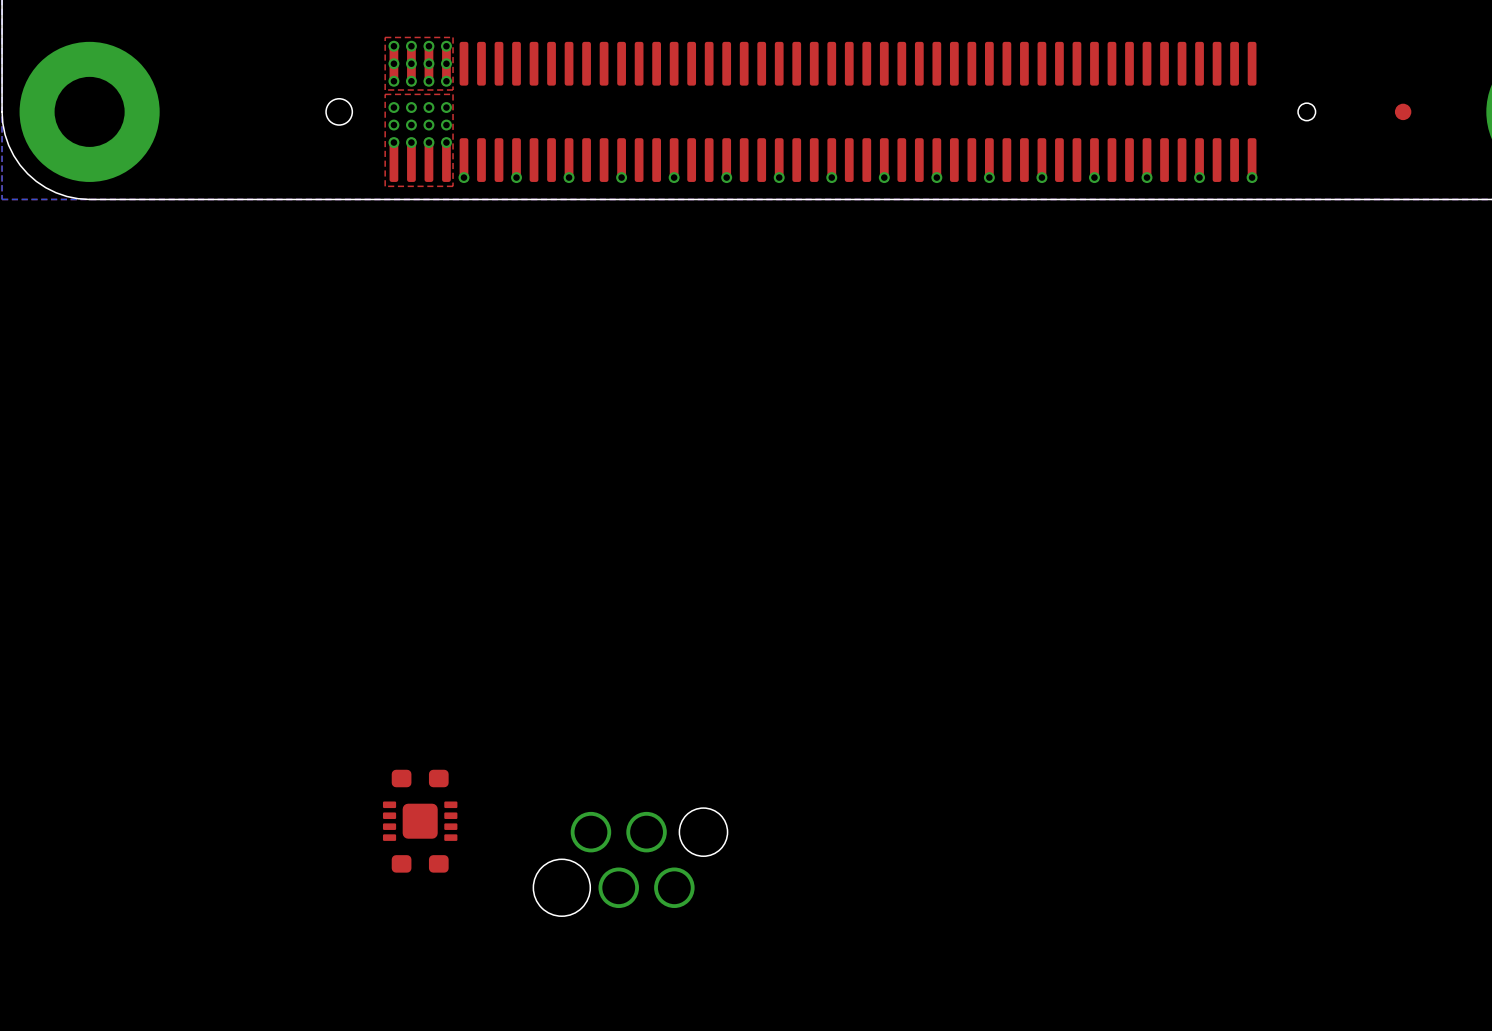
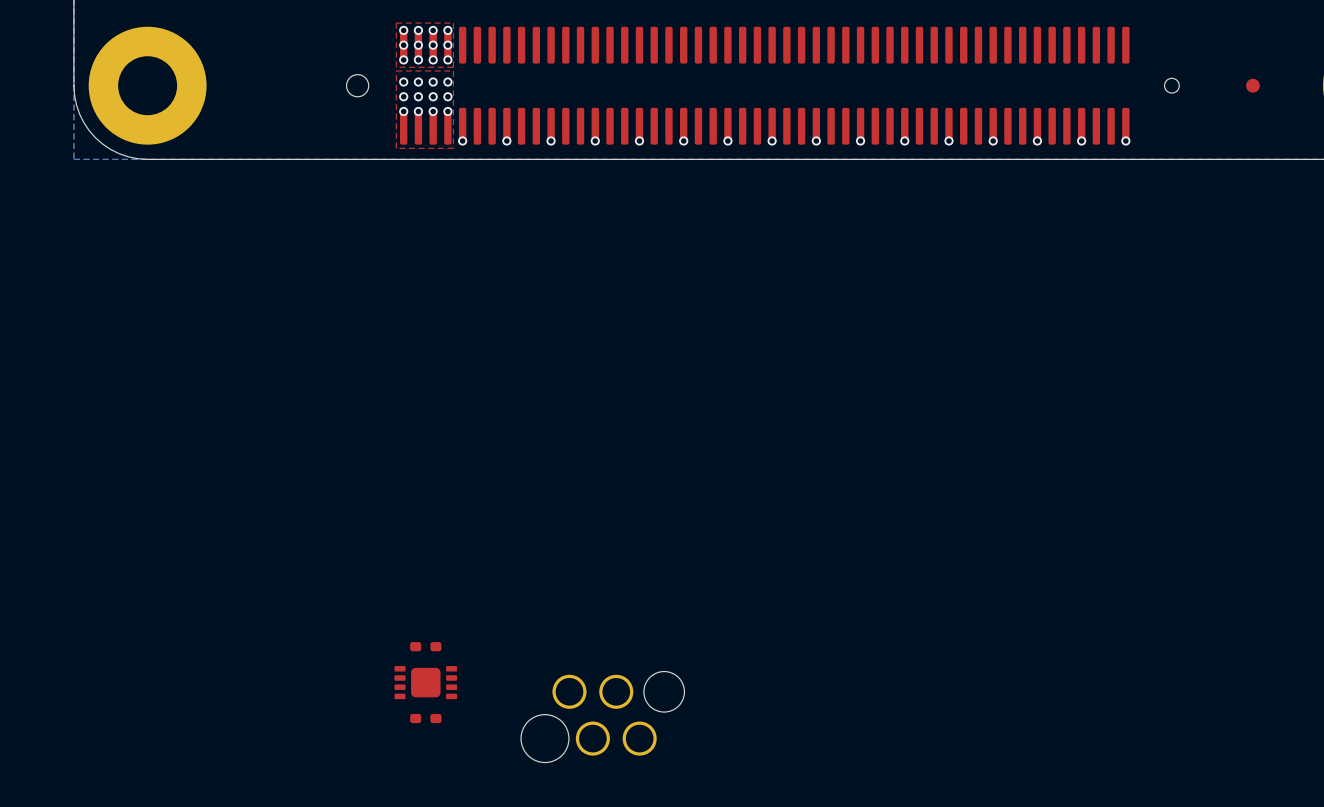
part footprint: [391, 769, 449, 788] -> [410, 642, 442, 652]
part footprint: [391, 855, 449, 873] -> [410, 713, 442, 724]

